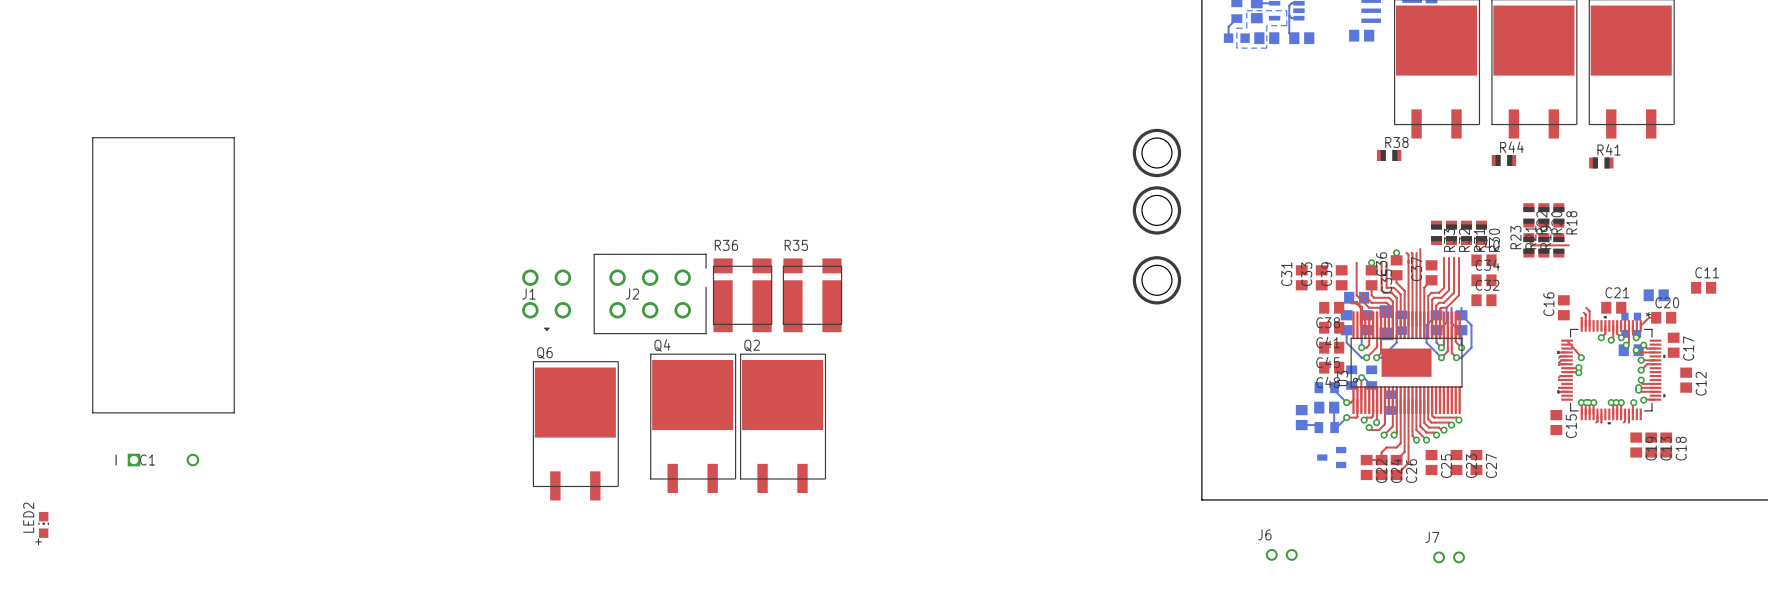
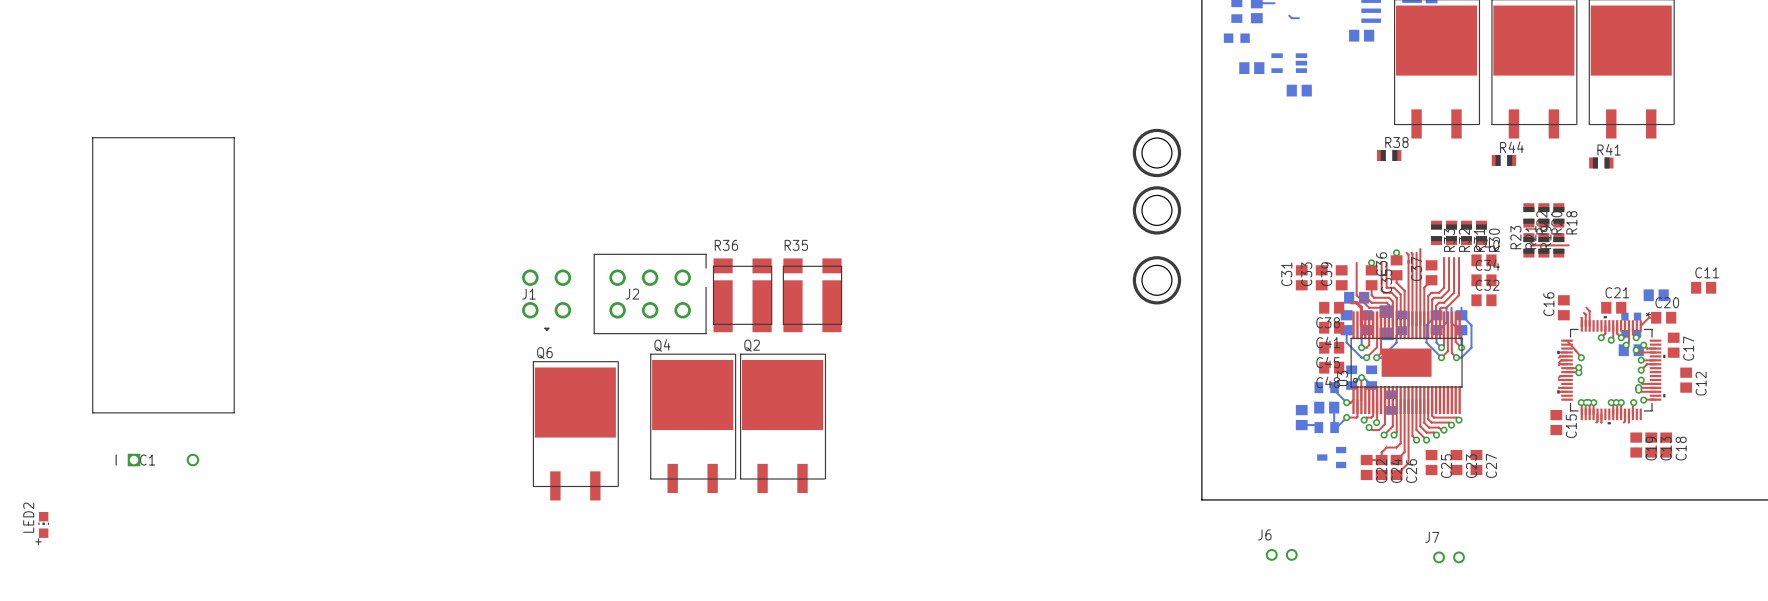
bottom track: (1298, 3) (1291, 3) (1289, 5) (1289, 33) (1294, 38) -> none
bottom zone outline: (1246, 10) (1246, 28) (1236, 28) (1236, 48) (1266, 48) (1266, 25) (1286, 25) (1286, 10) (1246, 10) -> none
part position: (1286, 10) -> (1289, 63)
bottom track: (1236, 18) (1228, 26) (1228, 38) -> none
part: (1266, 38) -> none
part: (1301, 38) -> none
part: none -> (1251, 68)
part: none -> (1299, 90)

